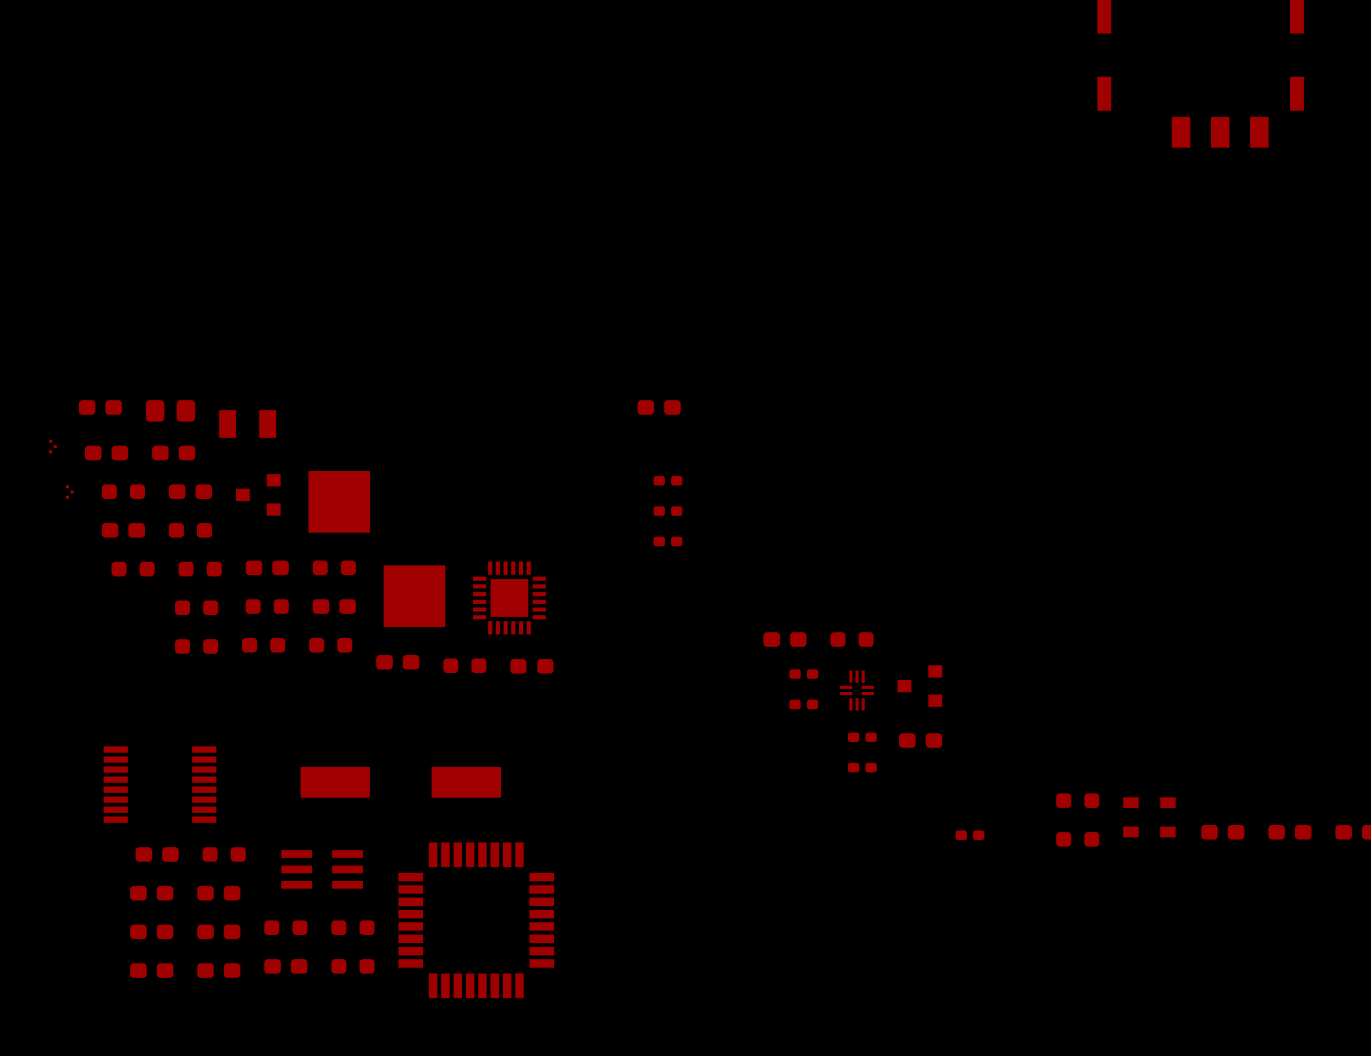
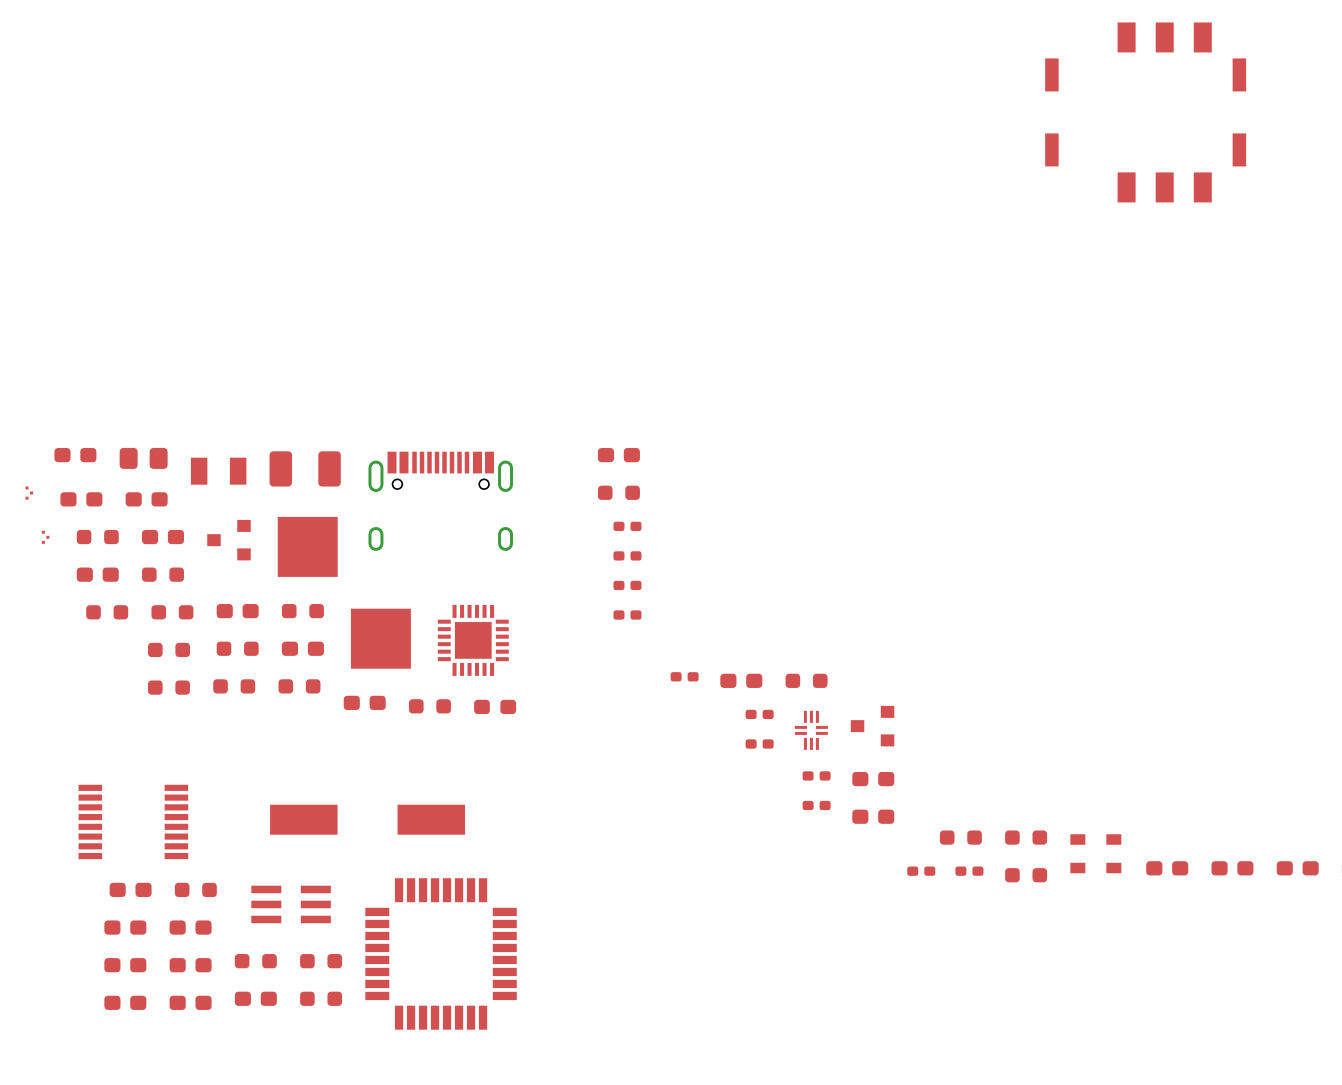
part: none -> (305, 468)
part: none -> (618, 492)
part: none -> (440, 501)
part: none -> (627, 615)
part: none -> (684, 676)
part: none -> (873, 816)
part: none -> (960, 837)
part: none -> (969, 871)

